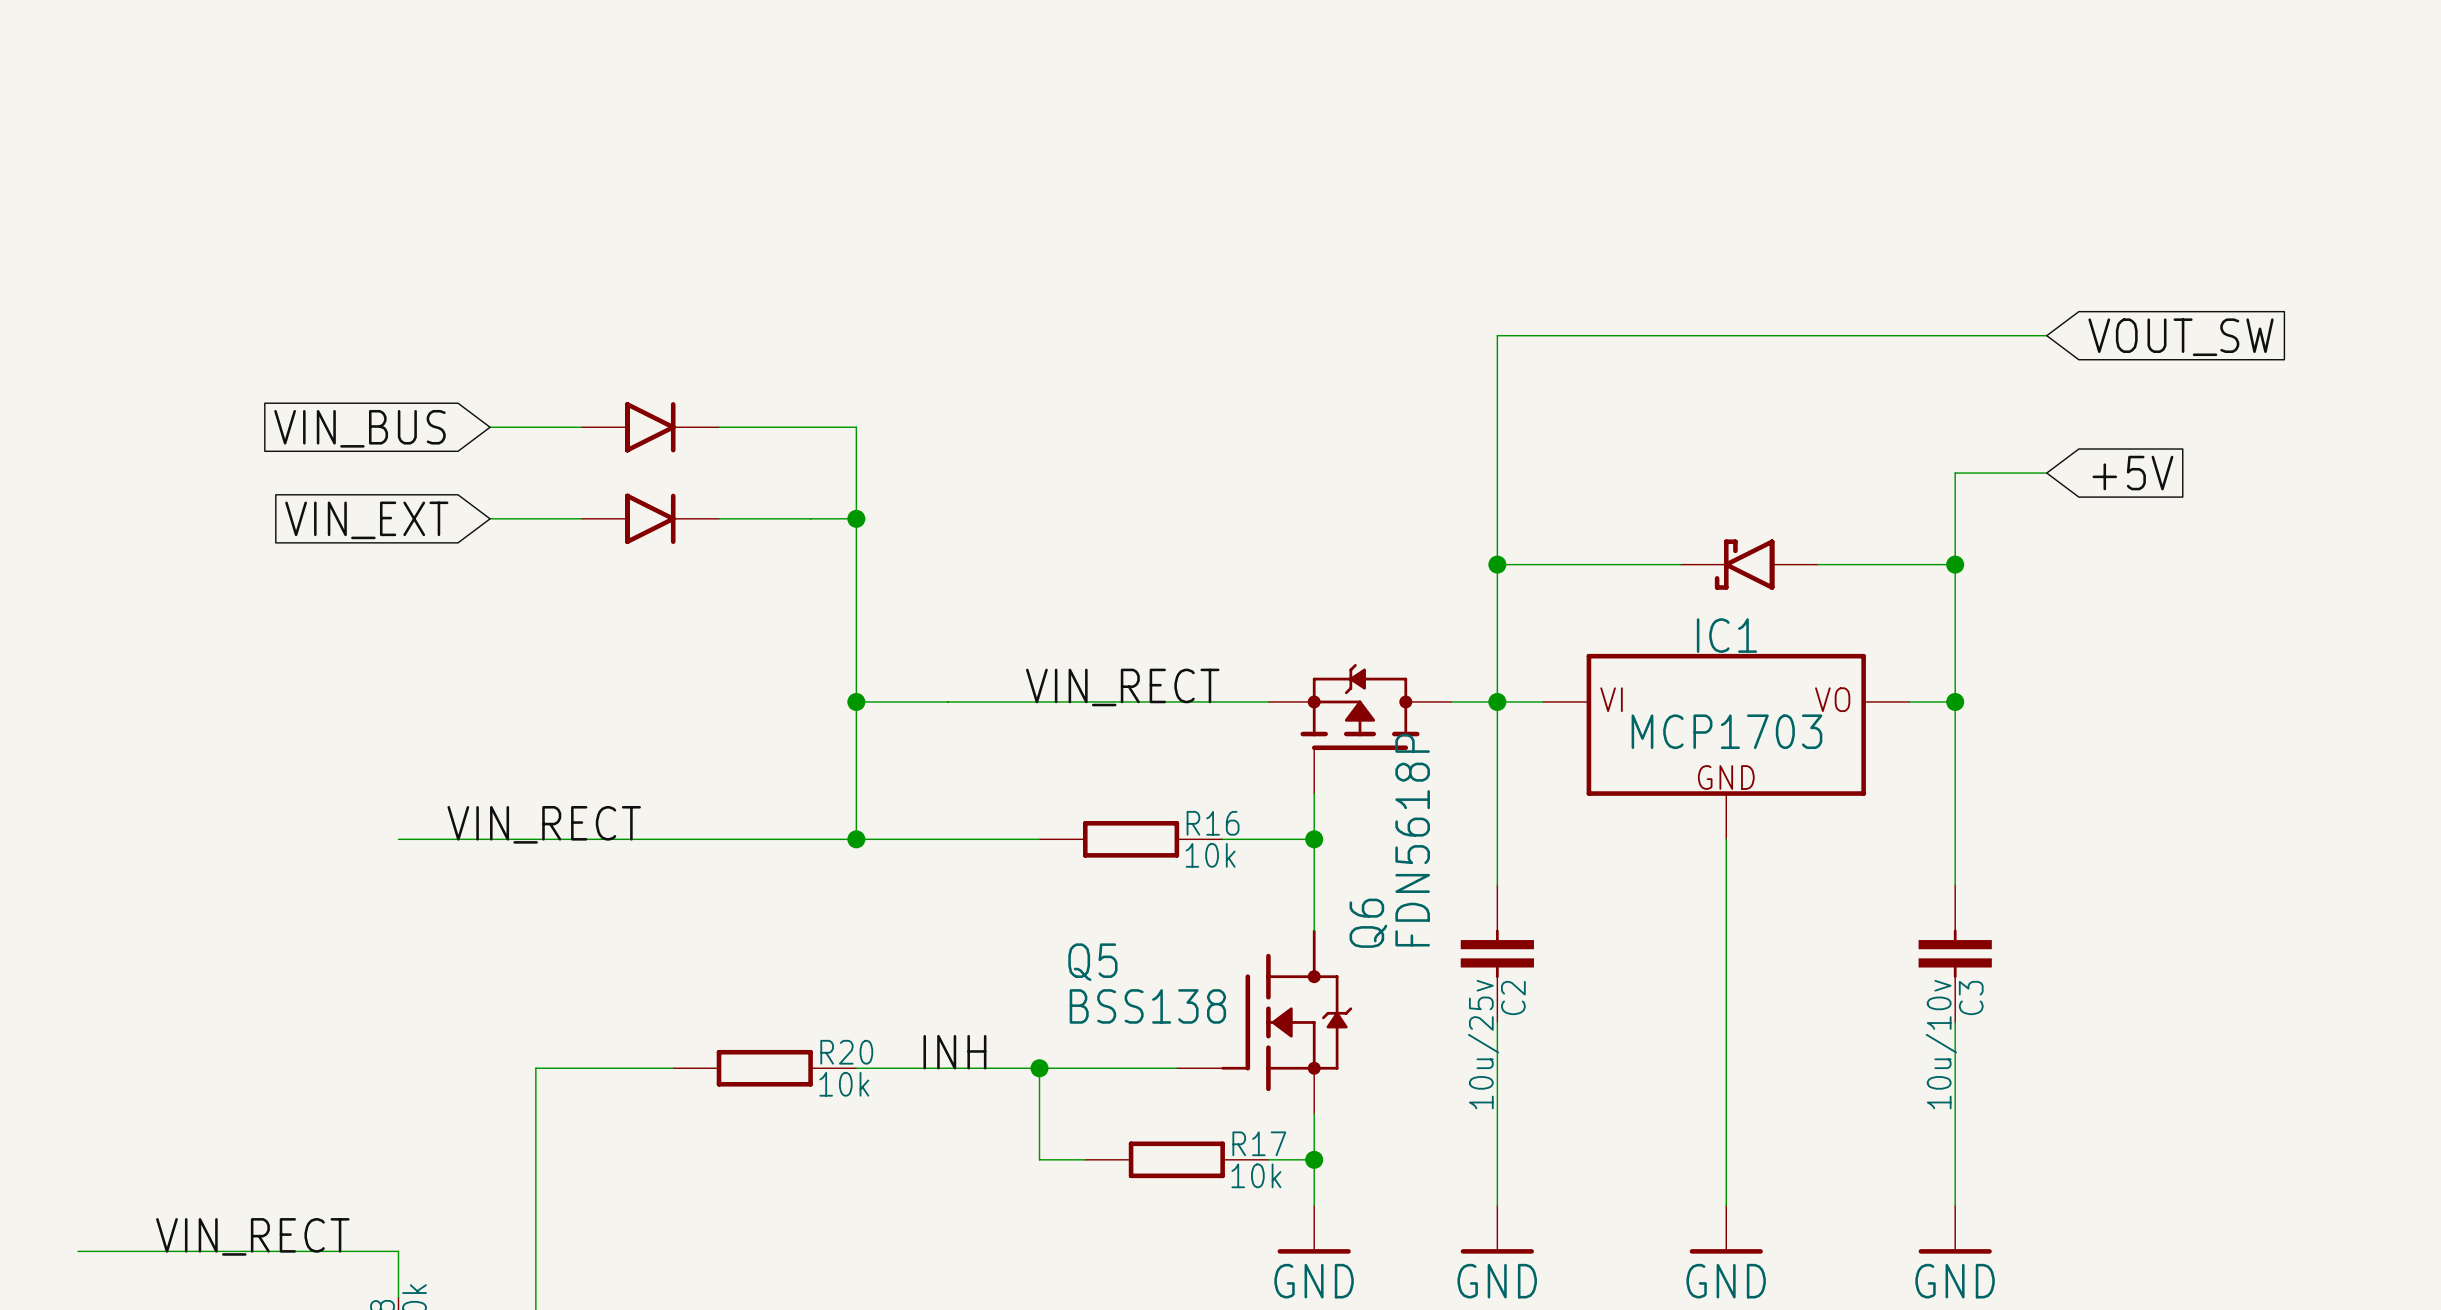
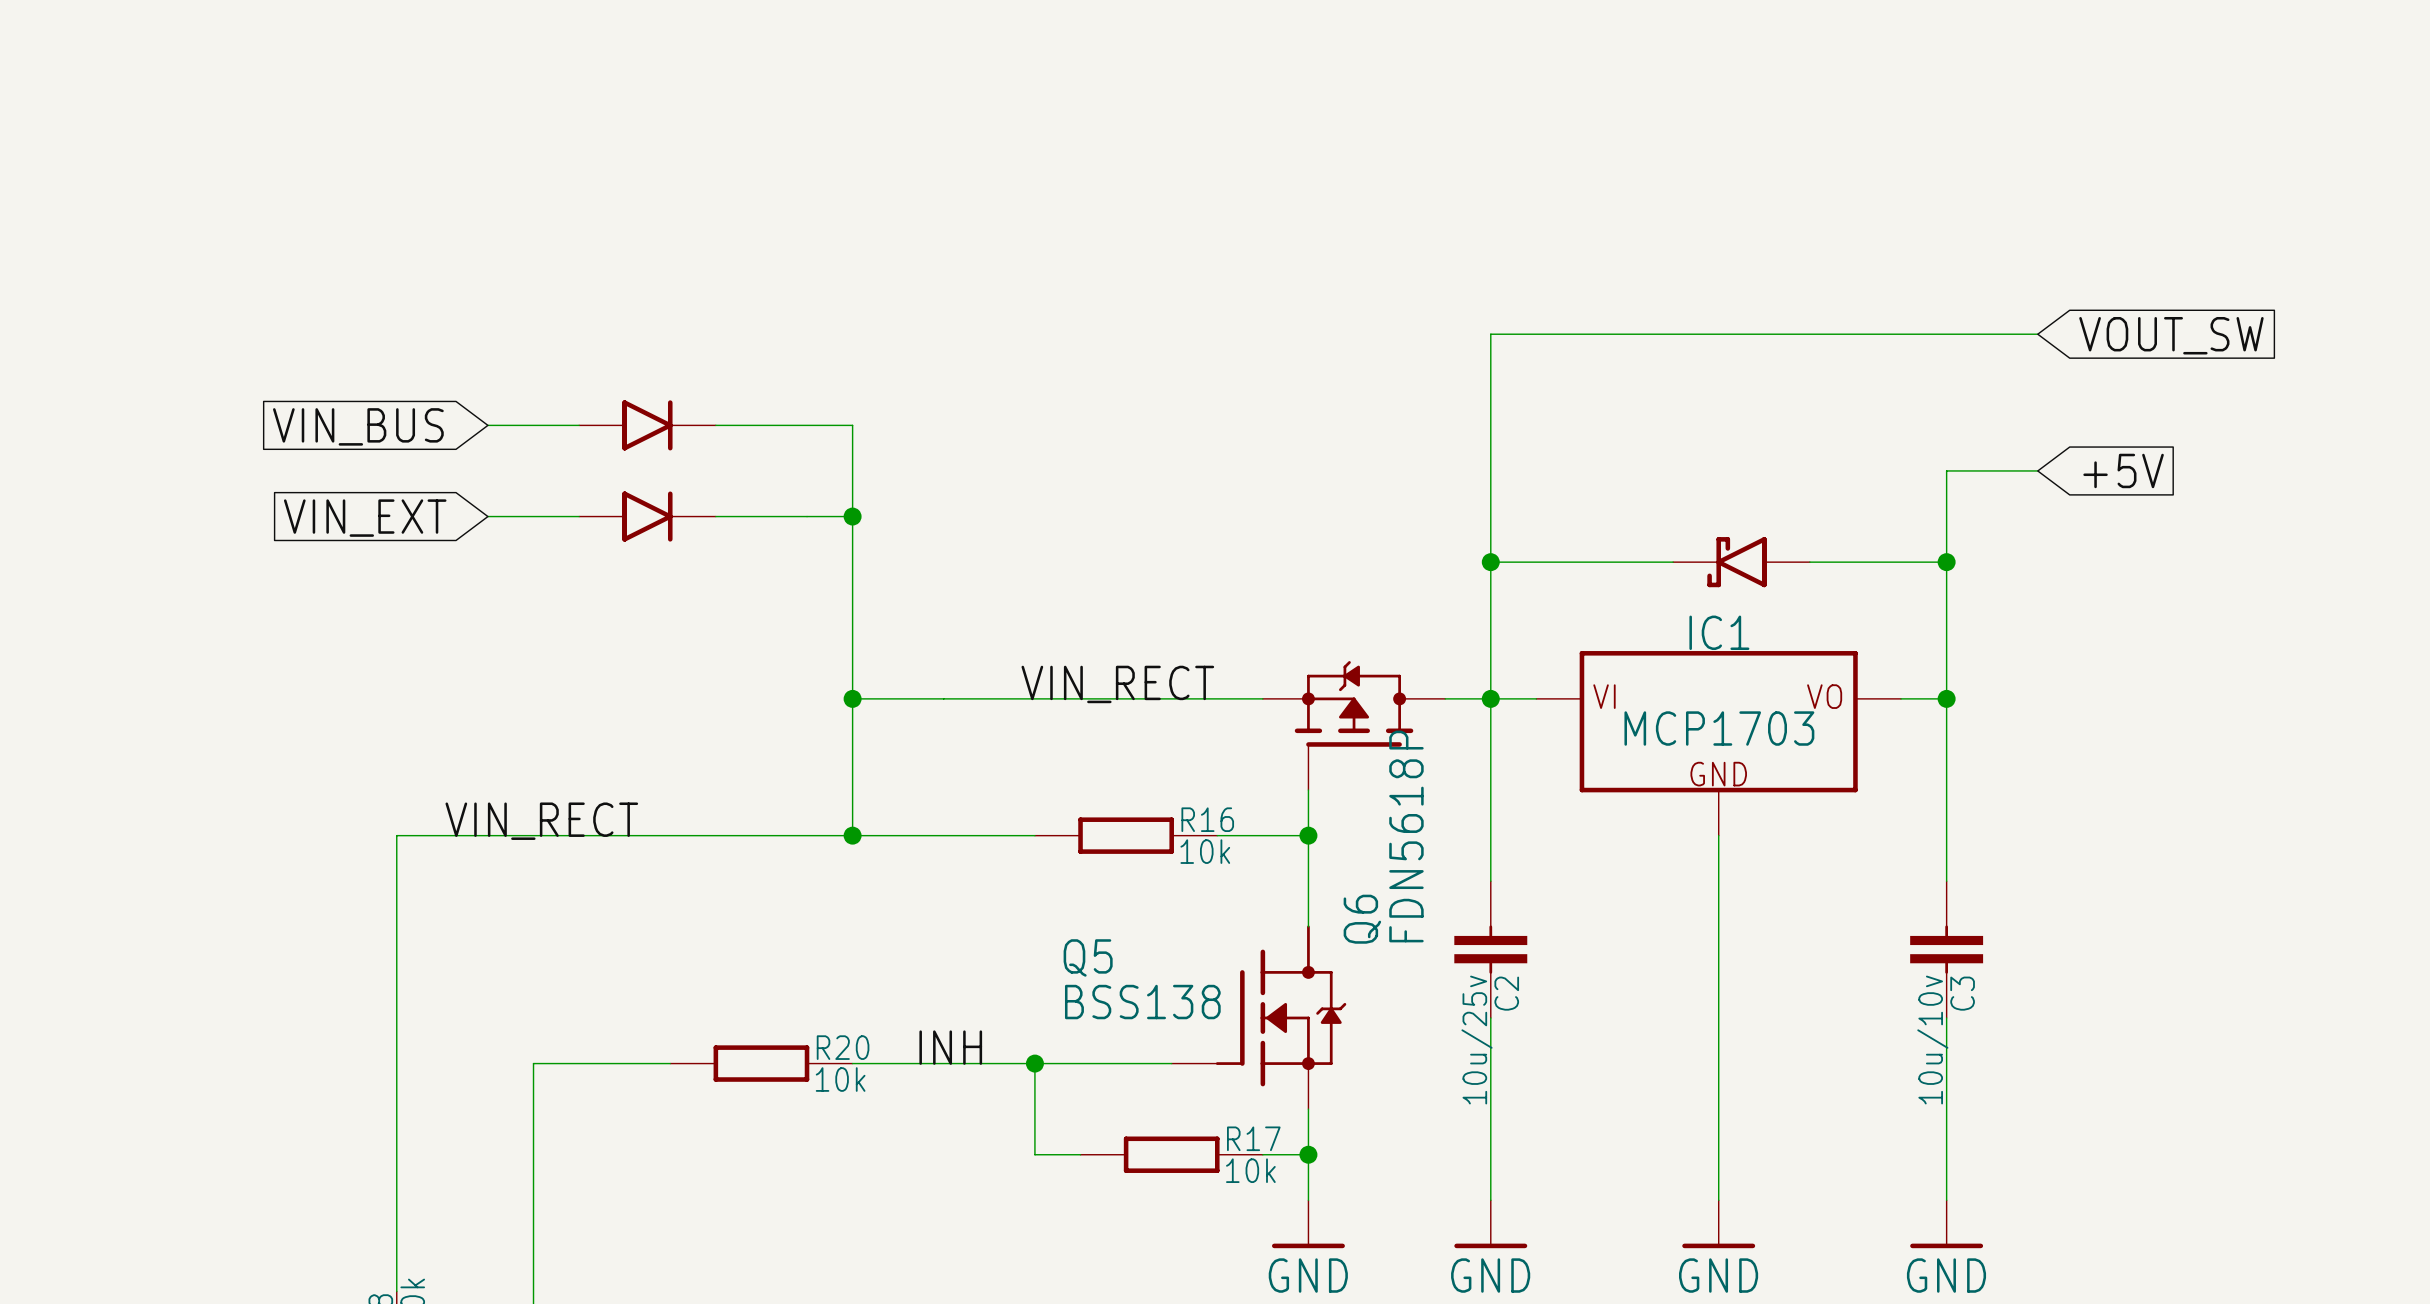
label: VIN_RECT (252, 1236) -> none
wire: (78, 1251) (398, 1251) -> (396, 835) (396, 1245)

